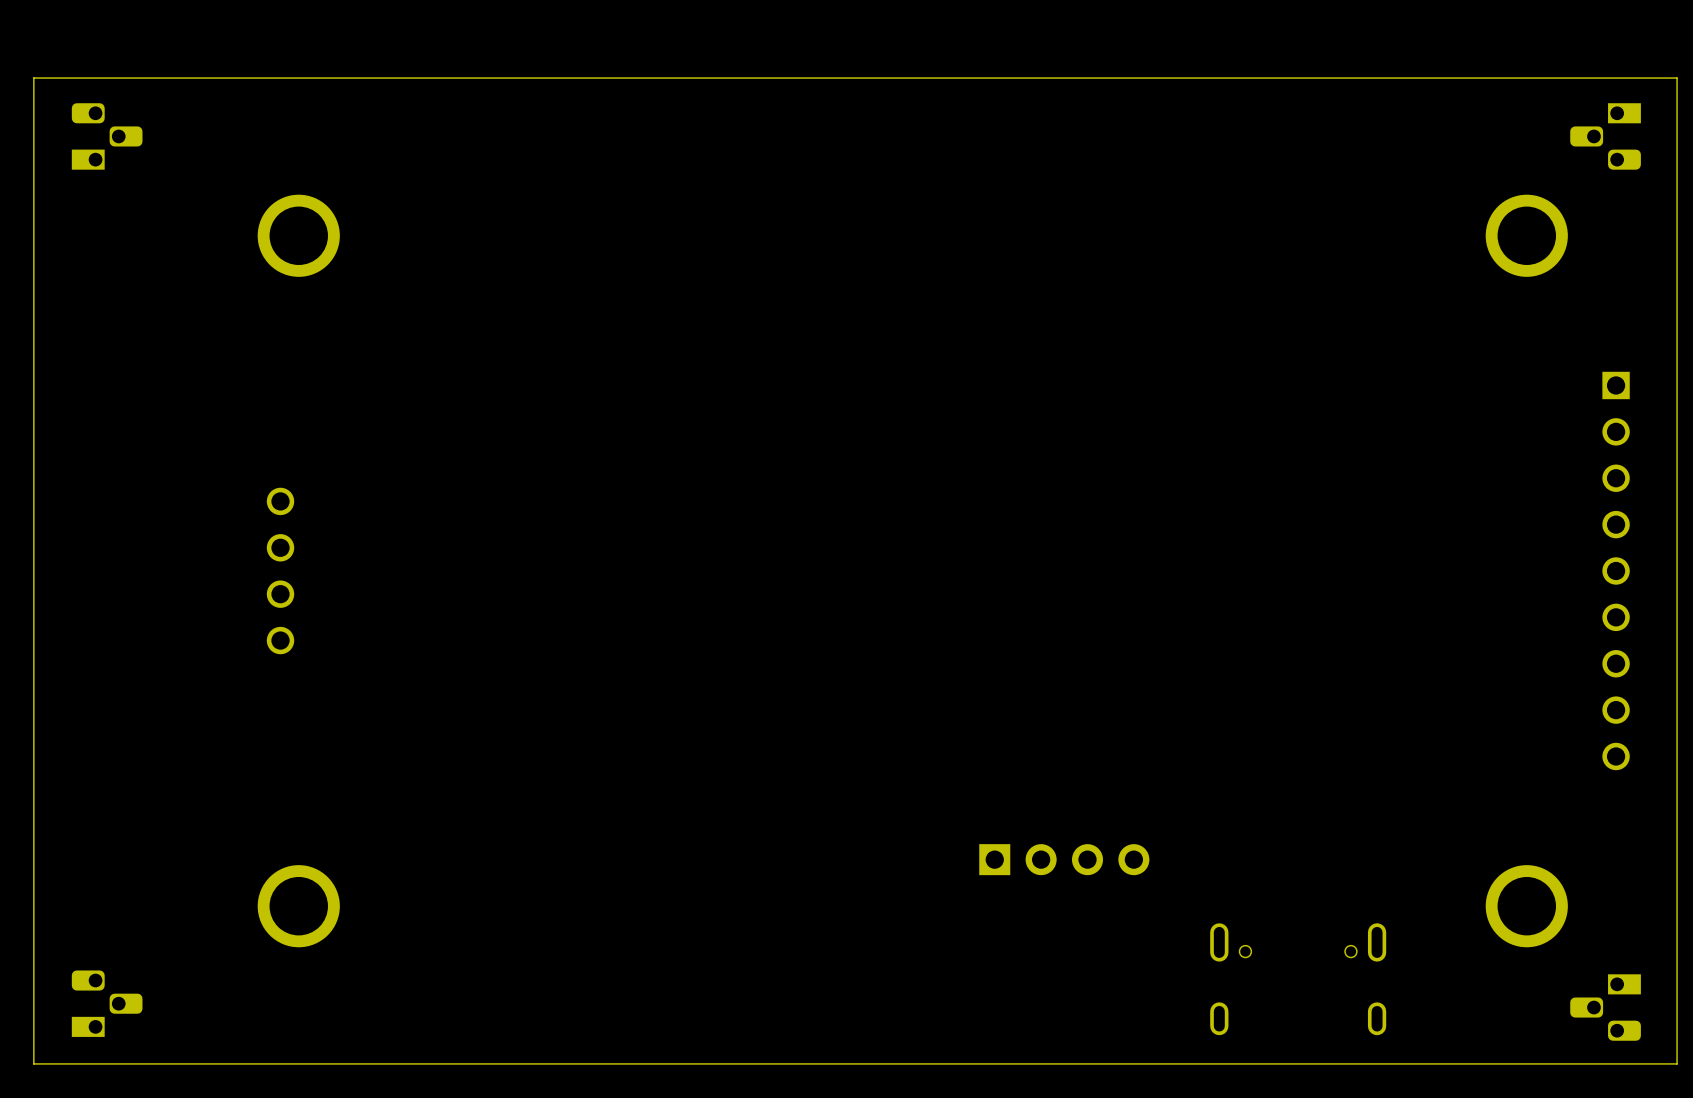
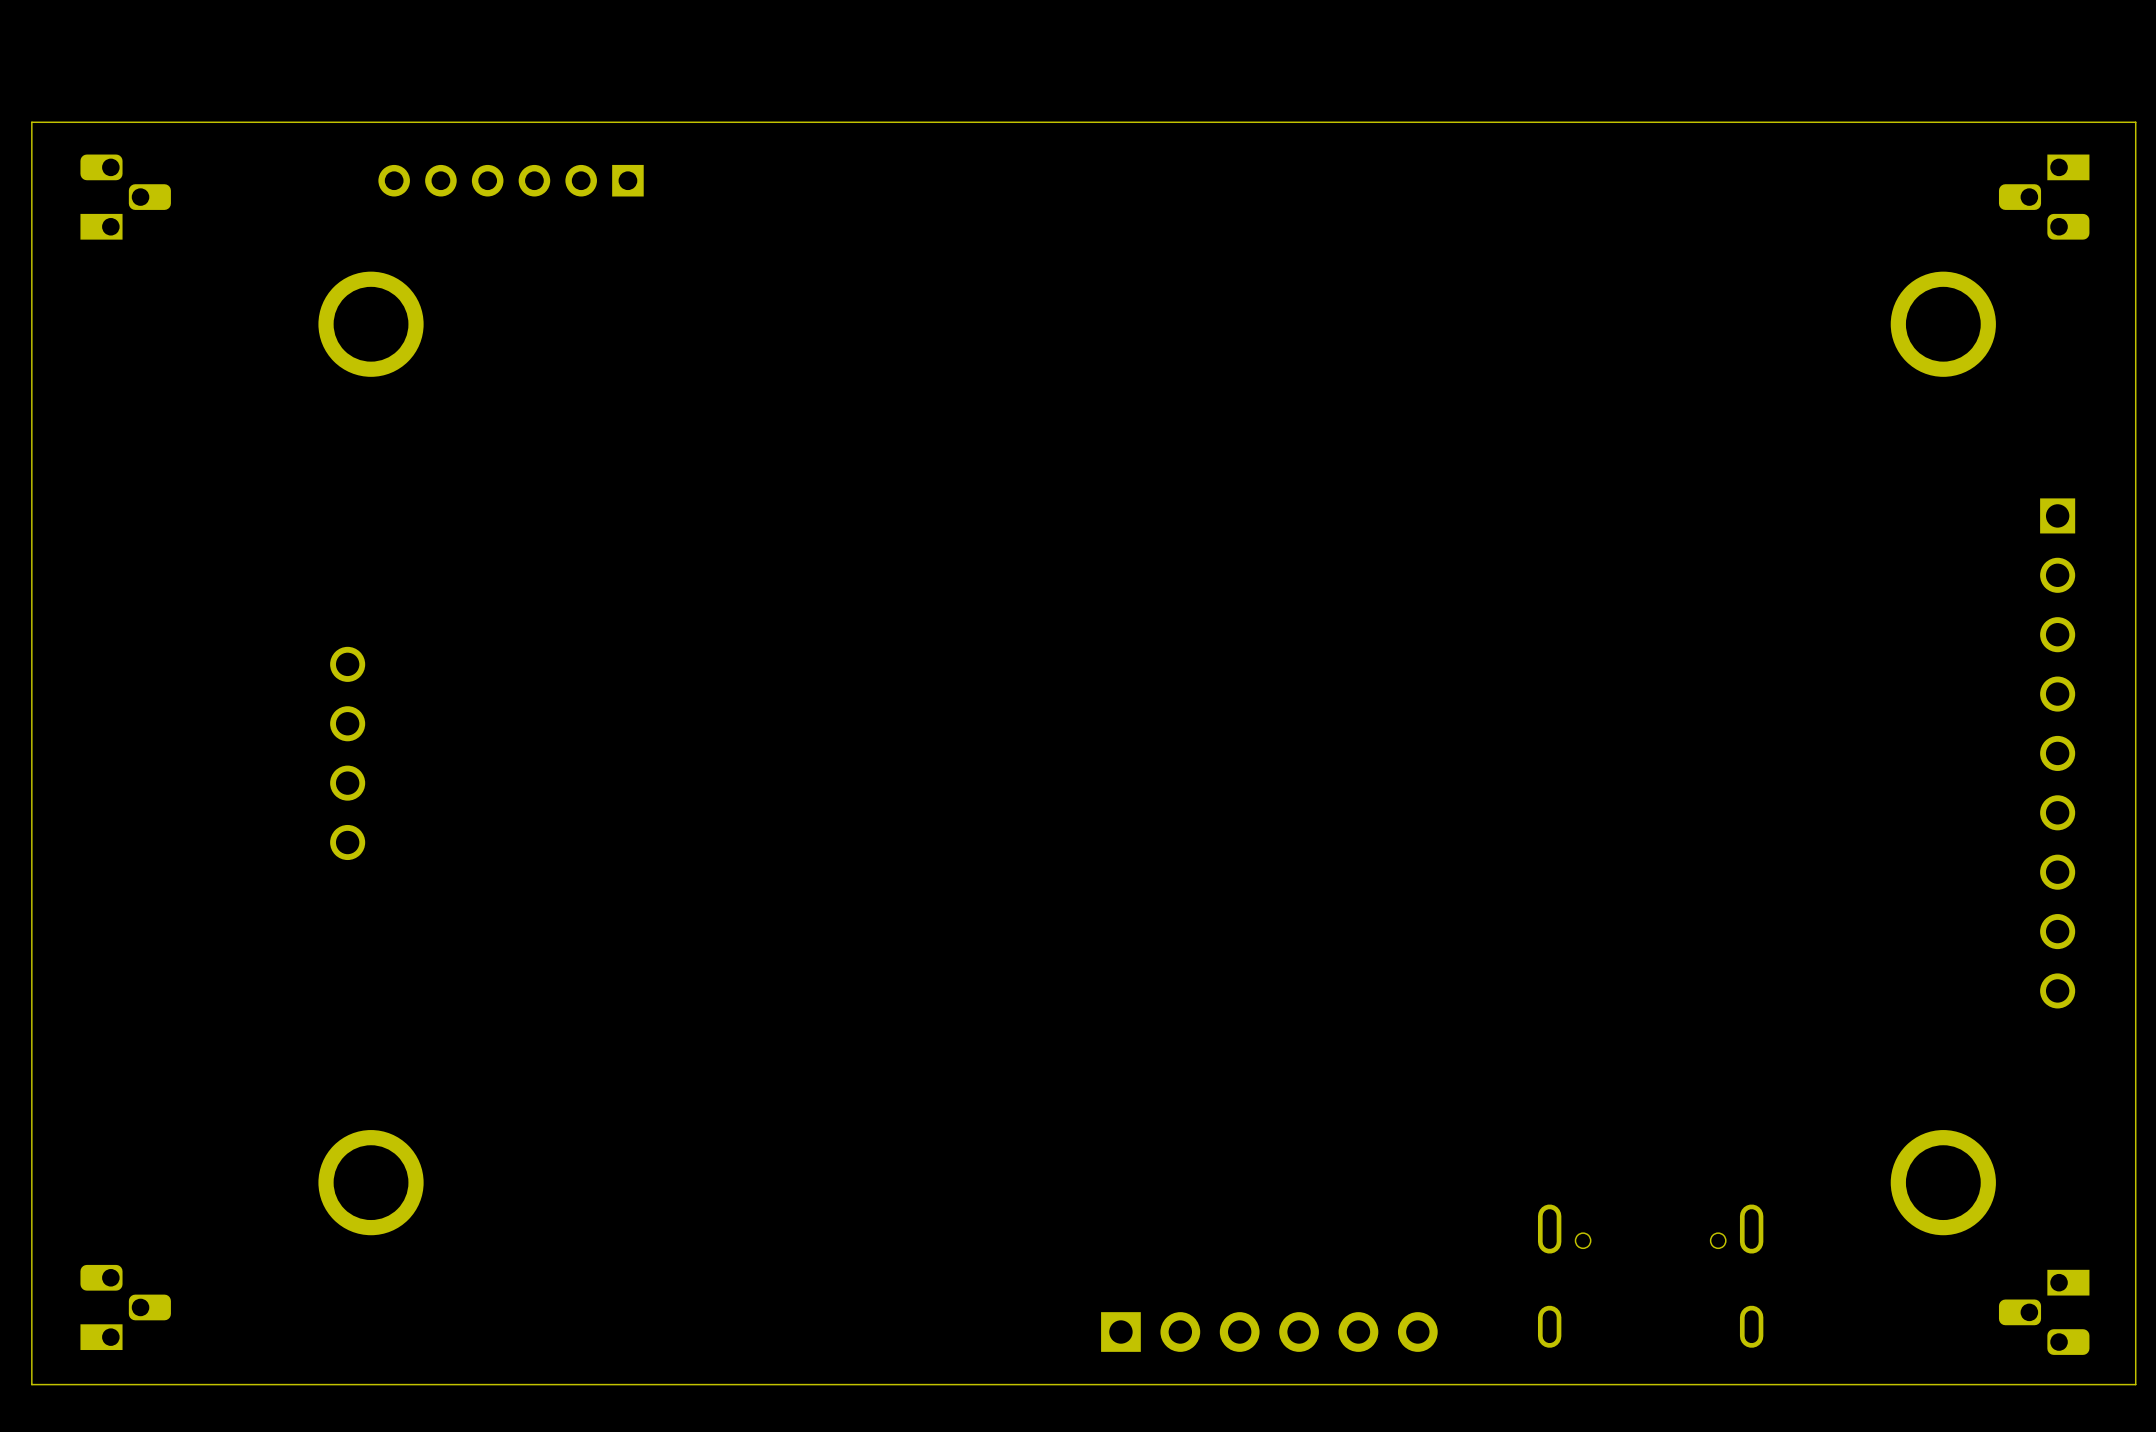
part: none -> (511, 180)
part: (1064, 859) -> none
part: none -> (1269, 1332)

